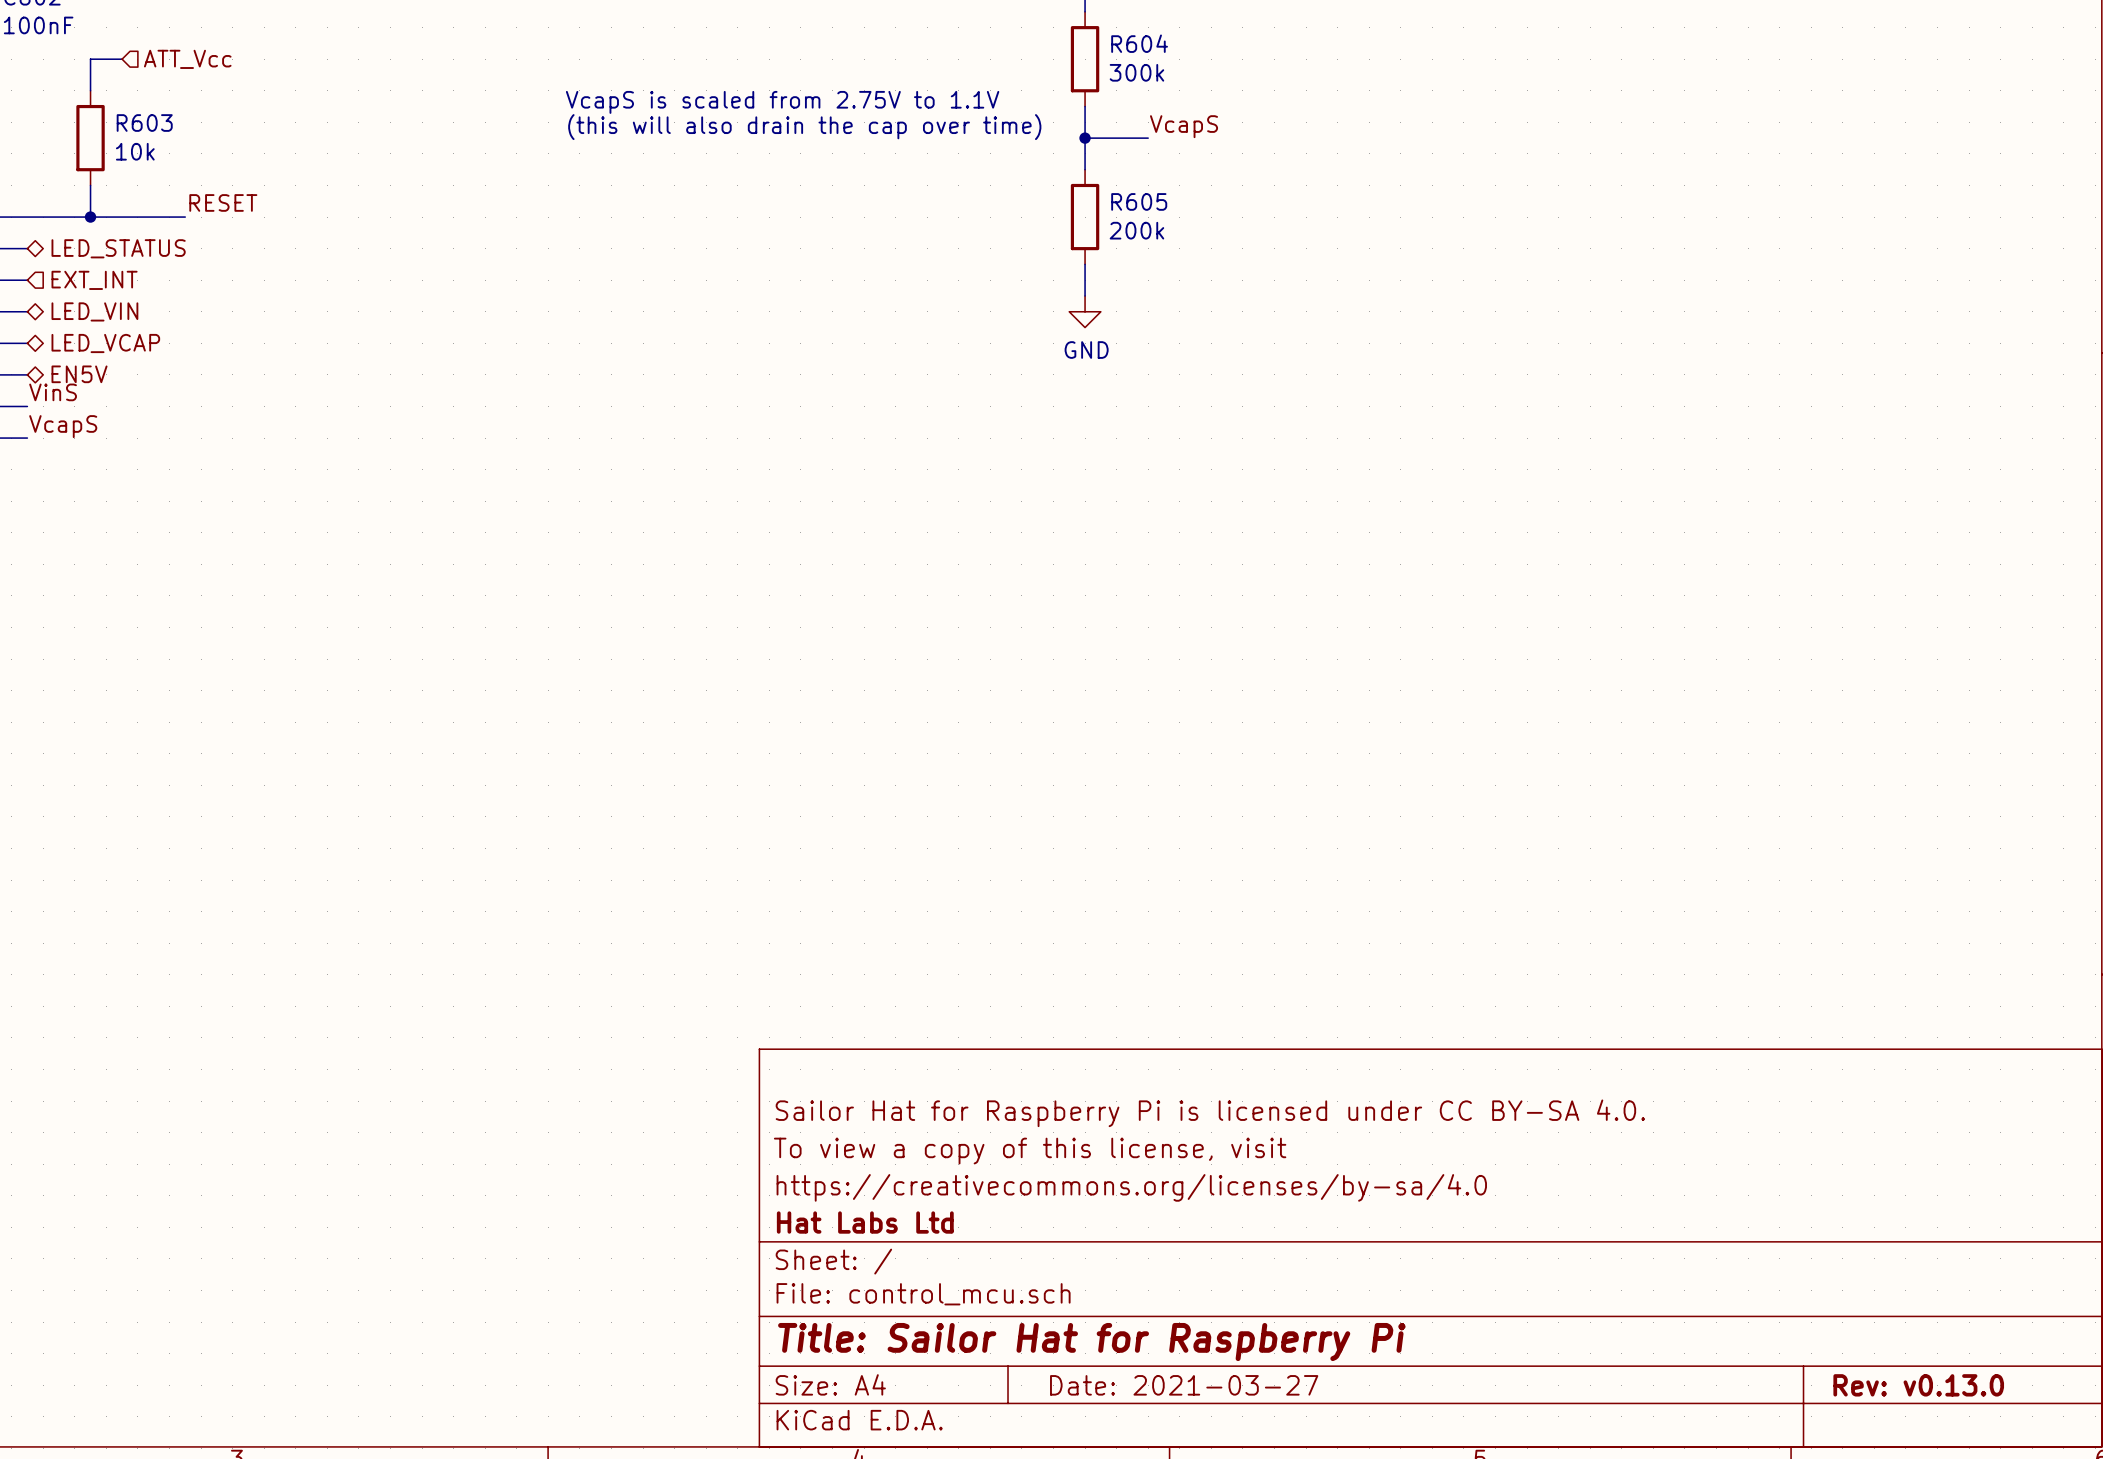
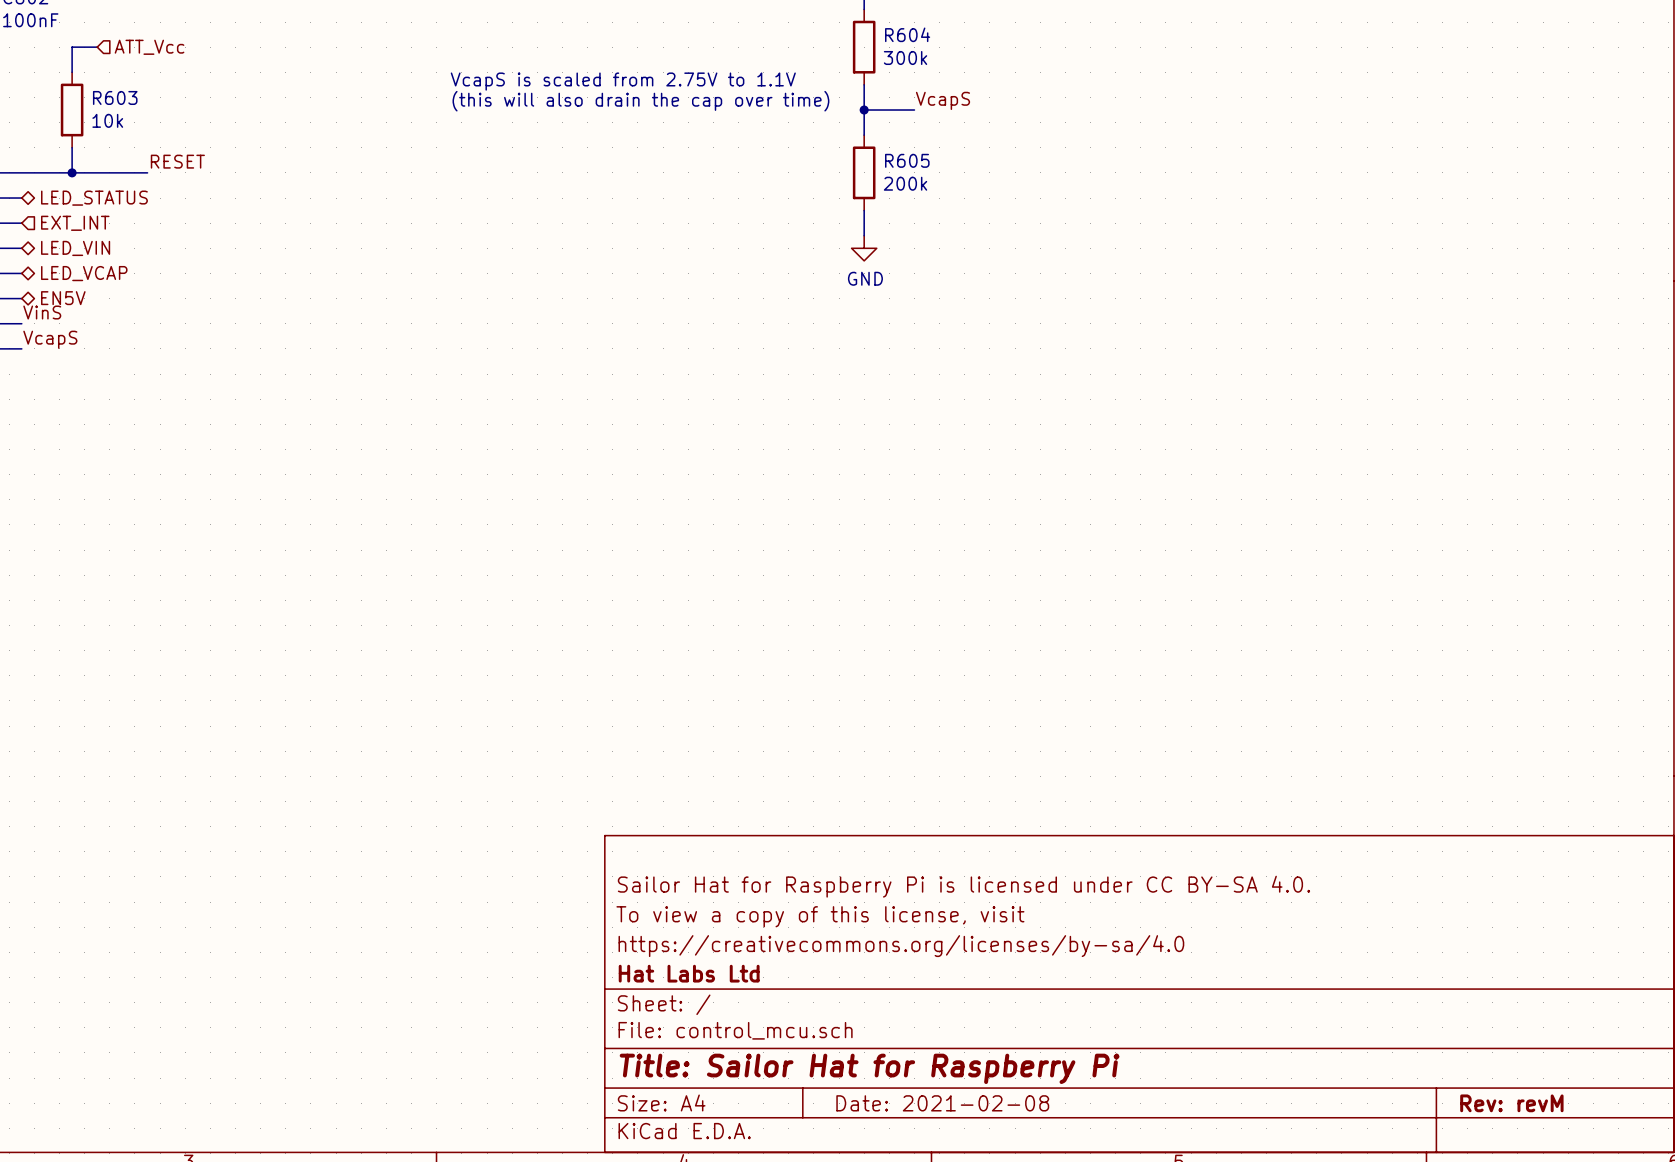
title block: Date: 2021-03-27 (1184, 1385) -> Date: 2021-02-08 (942, 1103)
title block: Rev: v0.13.0 (1918, 1385) -> Rev: revM (1511, 1103)

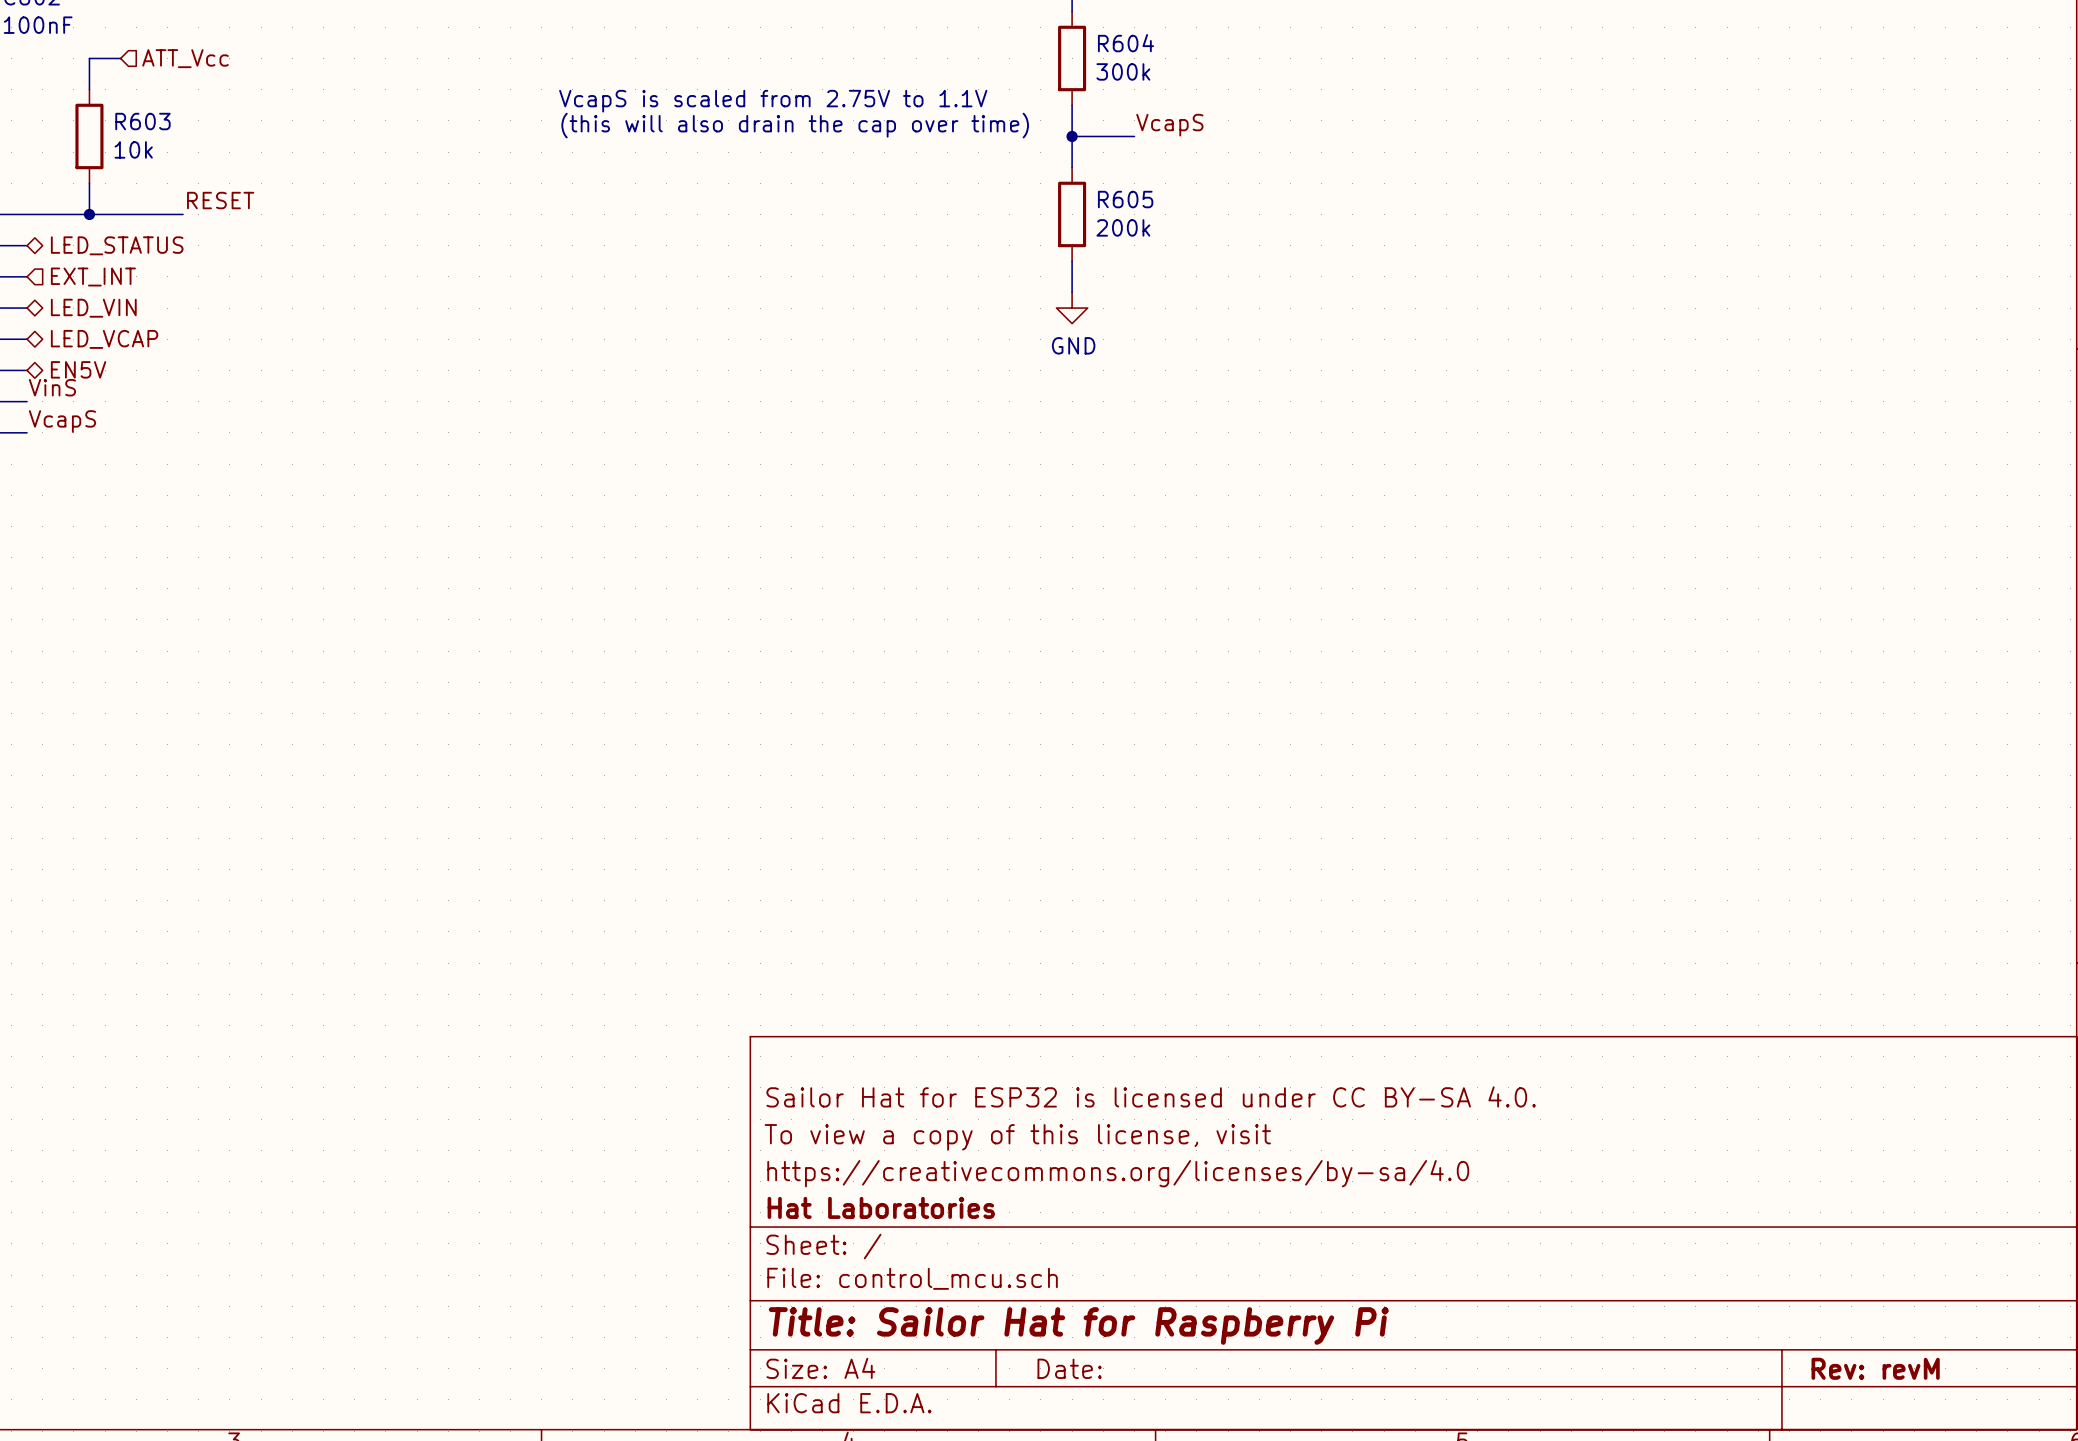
title block: Sailor Hat for Raspberry Pi is licensed under CC BY-SA 4.0. (963, 886) -> Sailor Hat for ESP32 is licensed under CC BY-SA 4.0. (1151, 1096)
title block: Hat Labs Ltd (689, 973) -> Hat Laboratories (881, 1207)
title block: Date: 2021-02-08 (942, 1103) -> Date: (1069, 1368)

